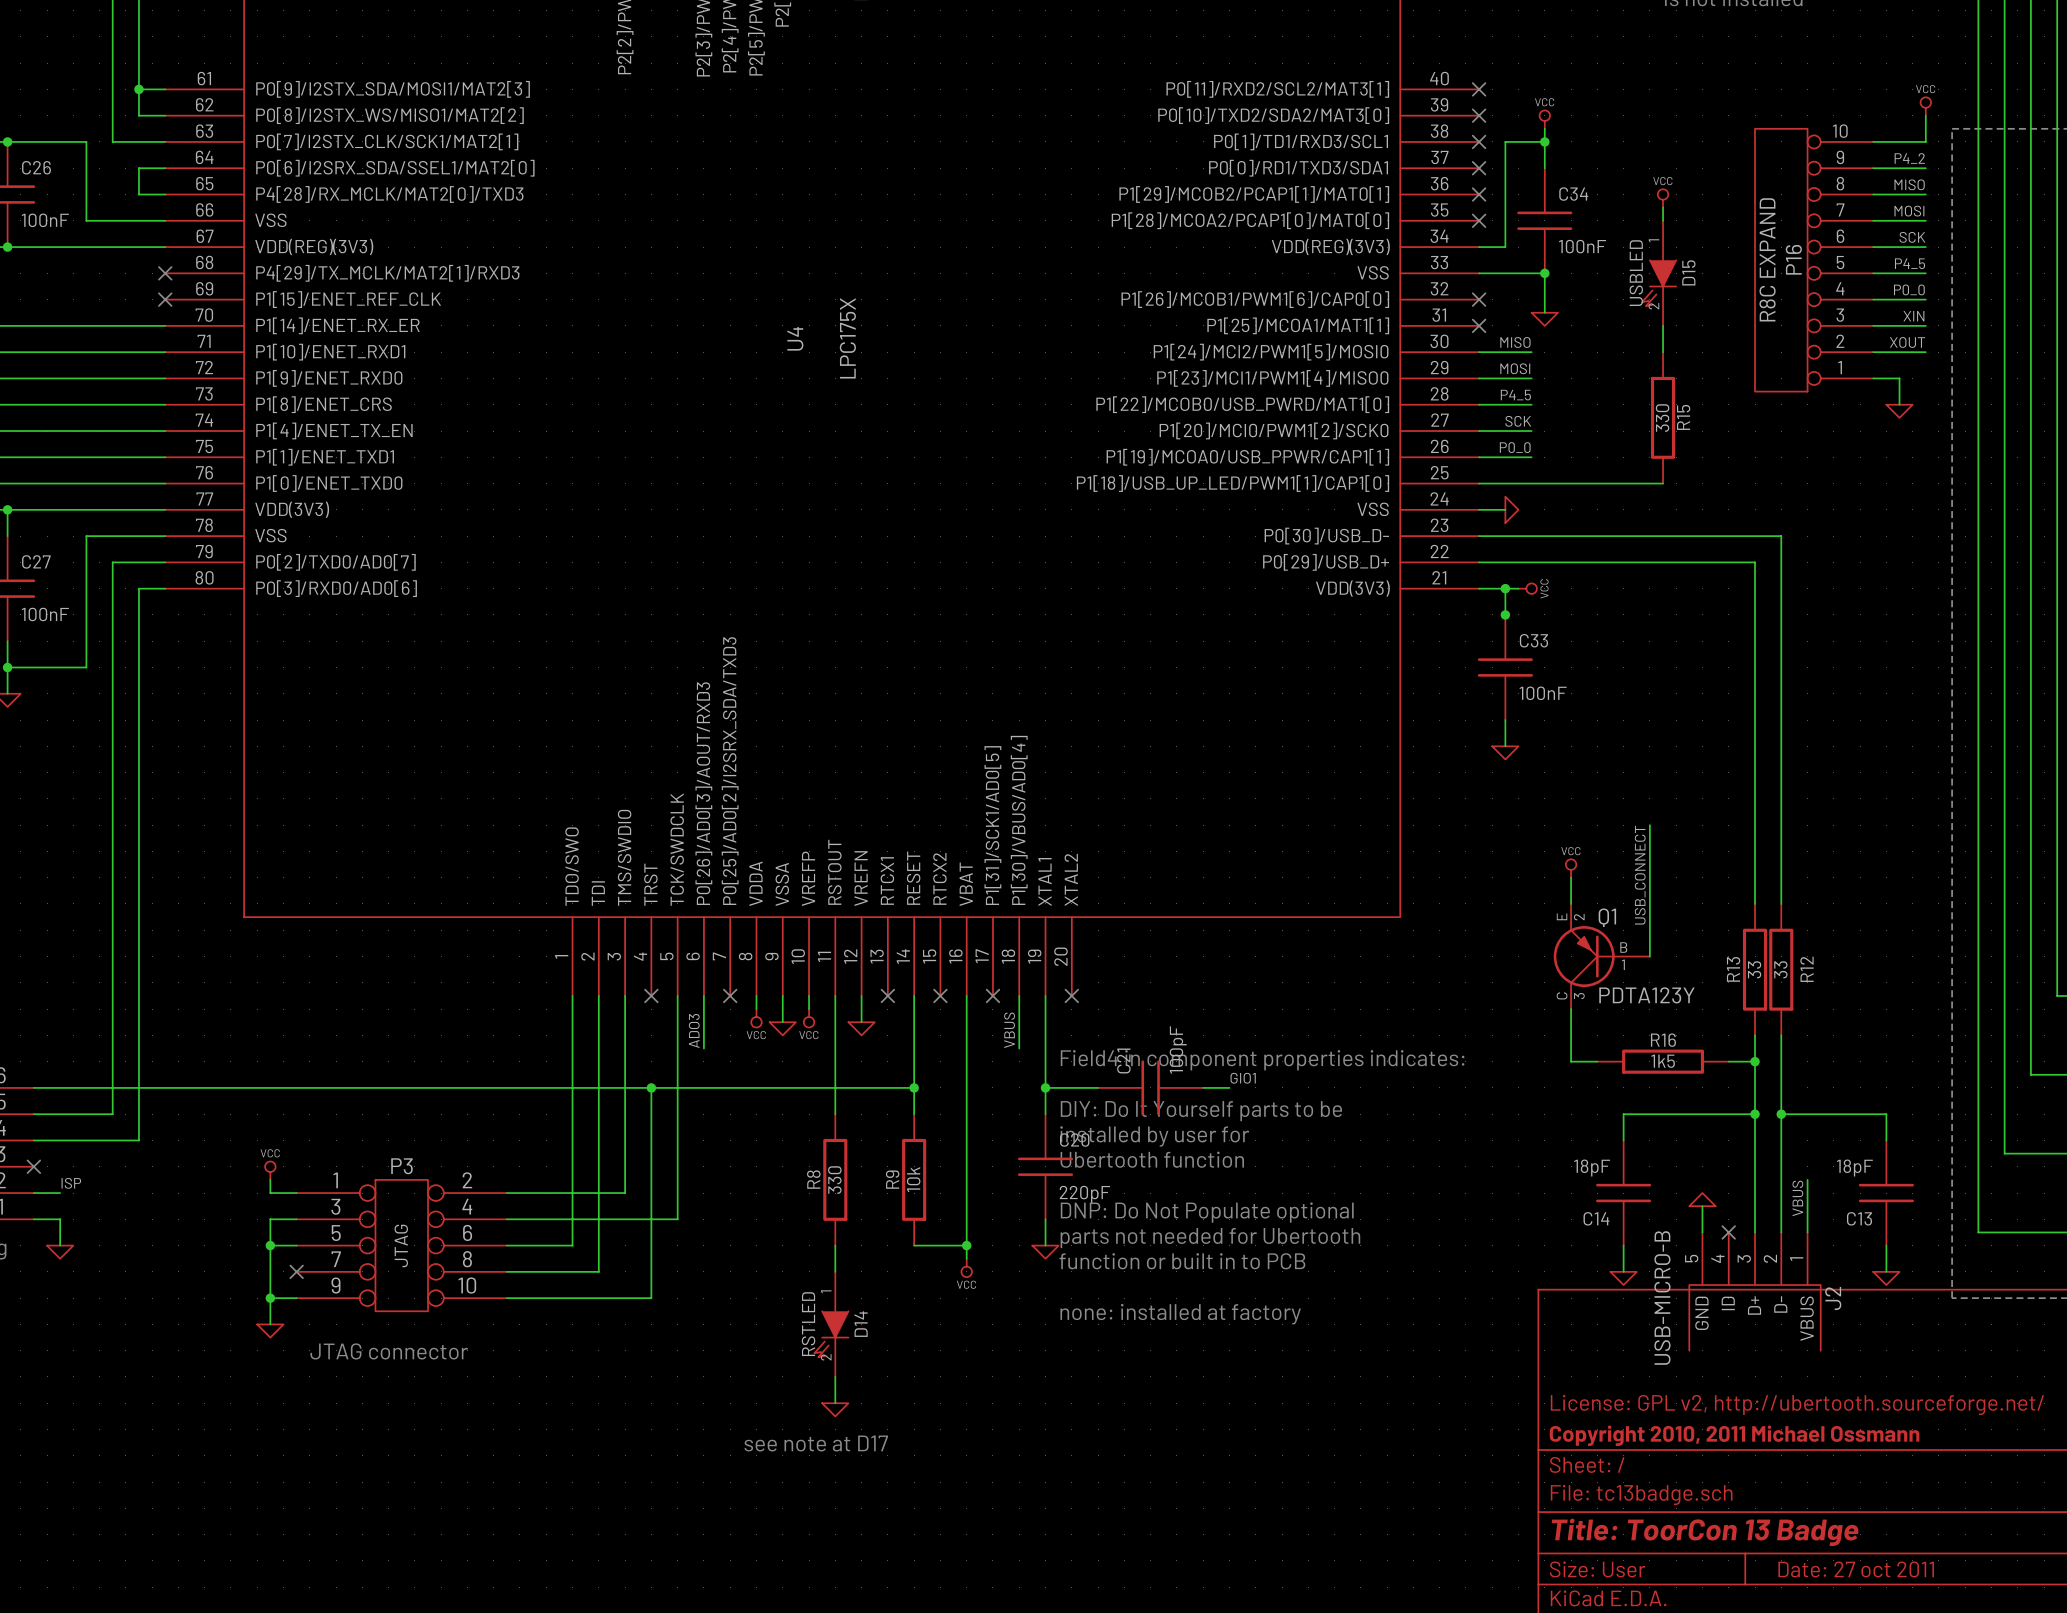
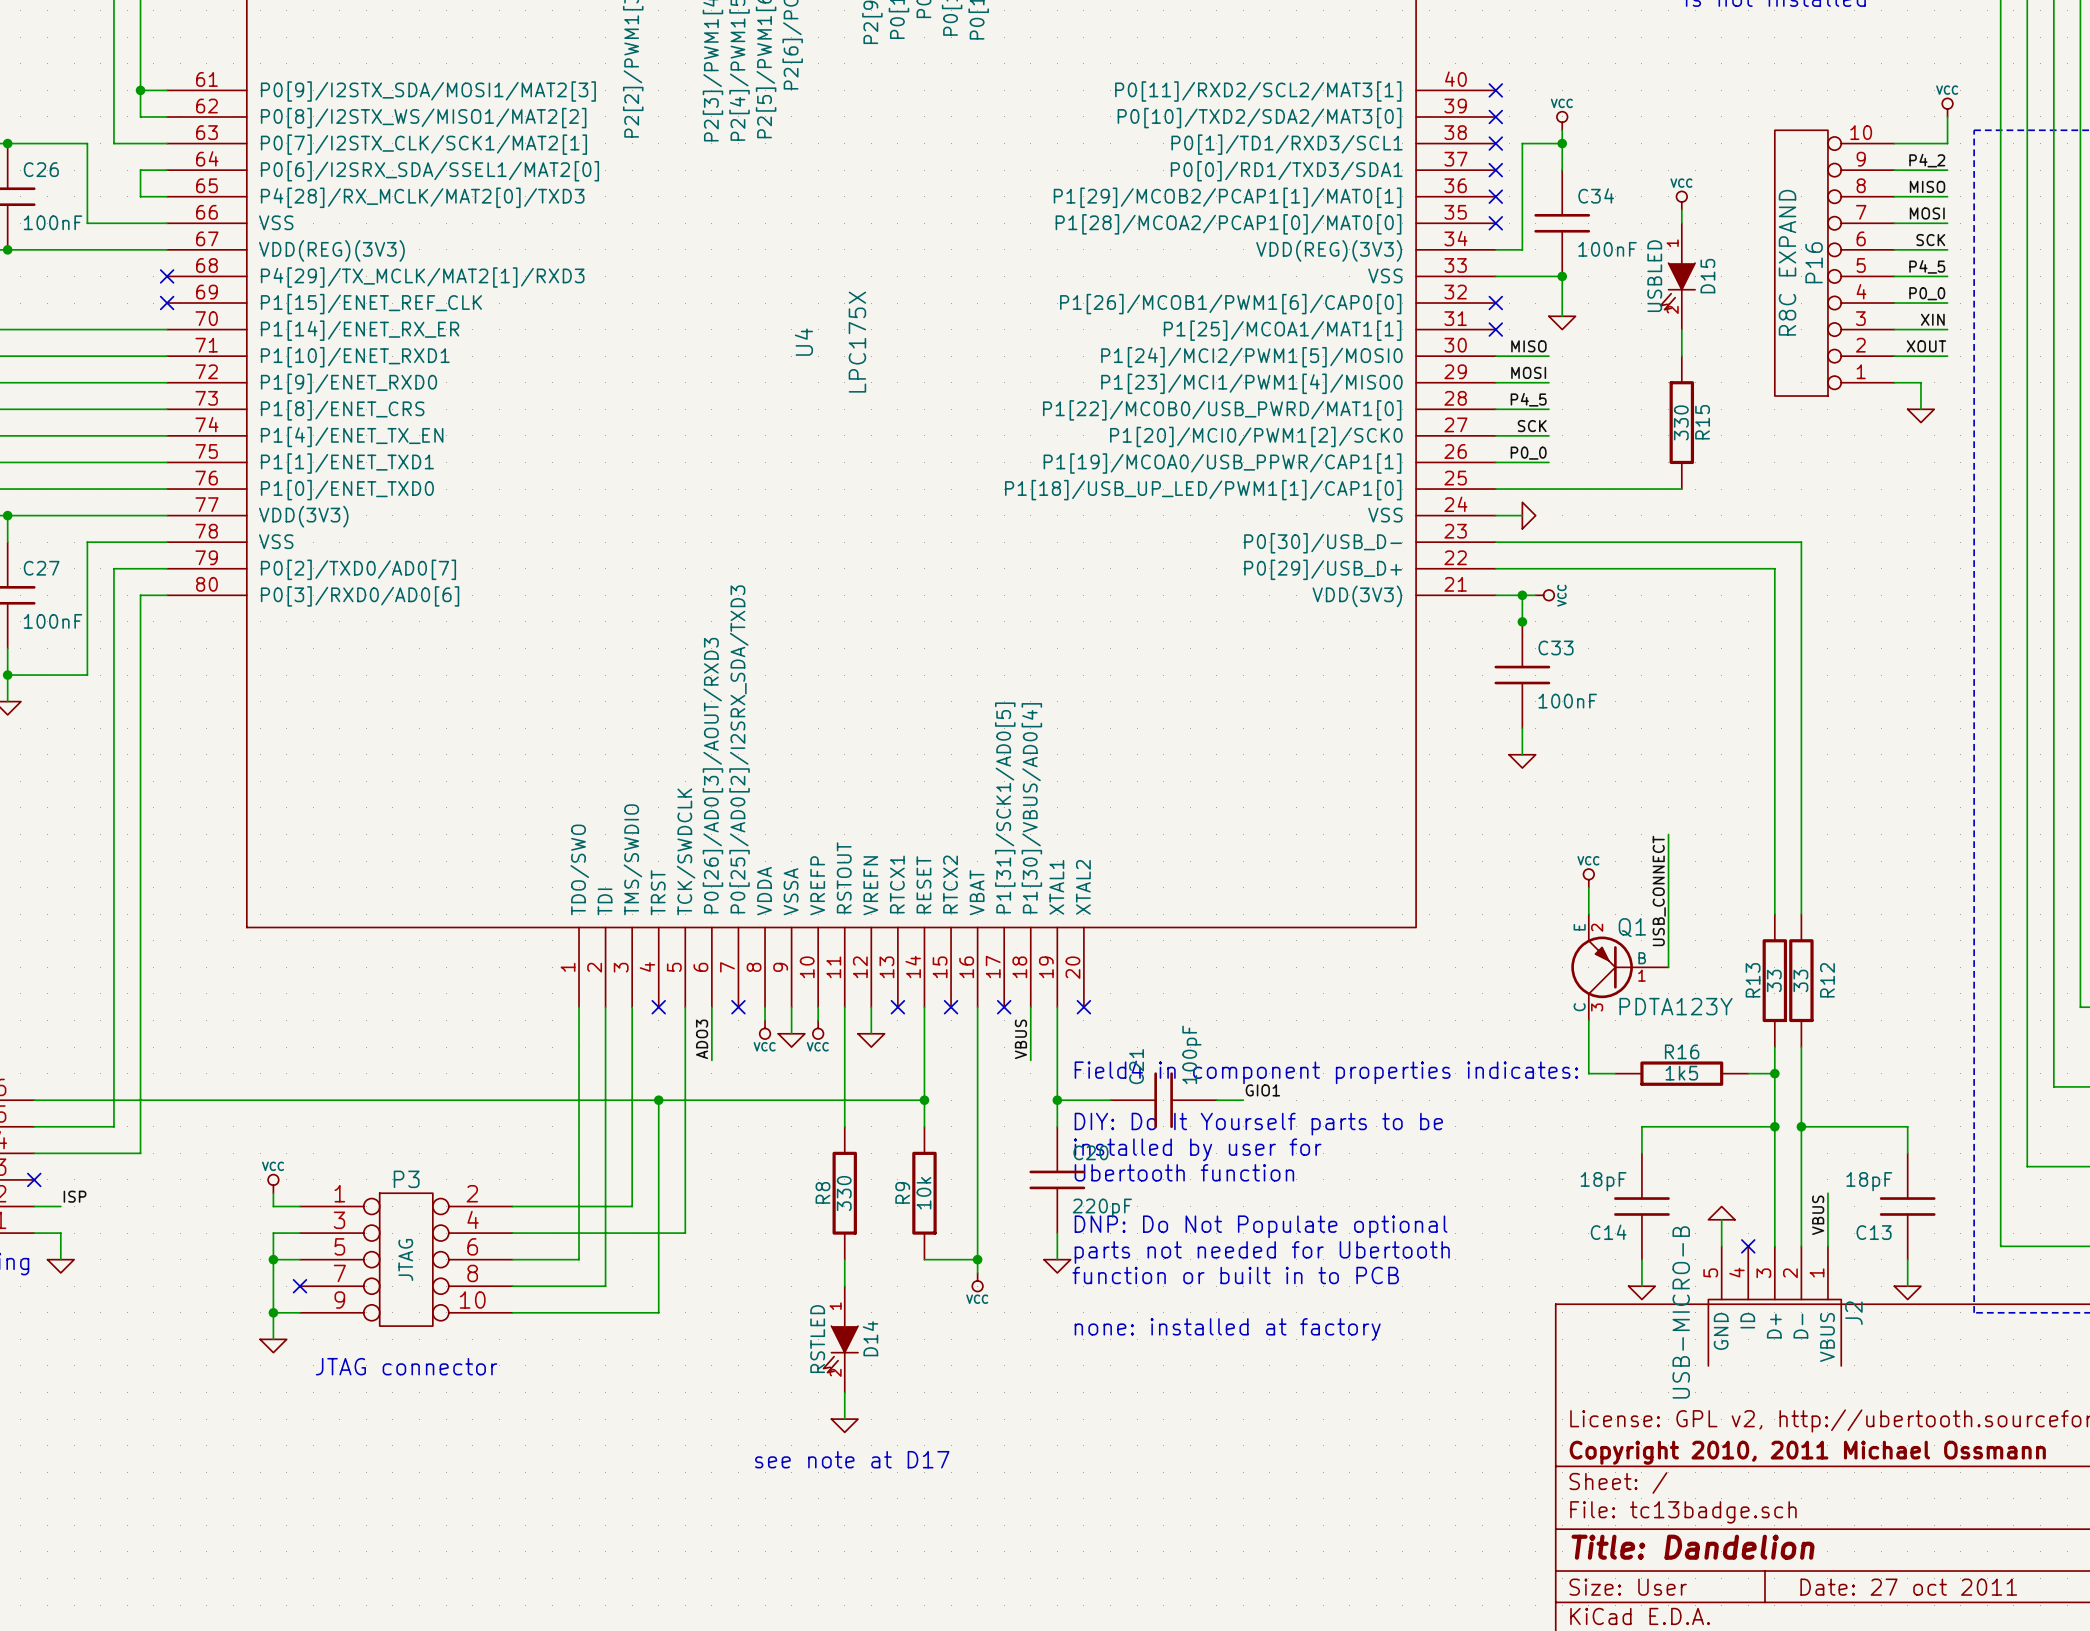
title block: Title: ToorCon 13 Badge (1705, 1532) -> Title: Dandelion (1693, 1547)

